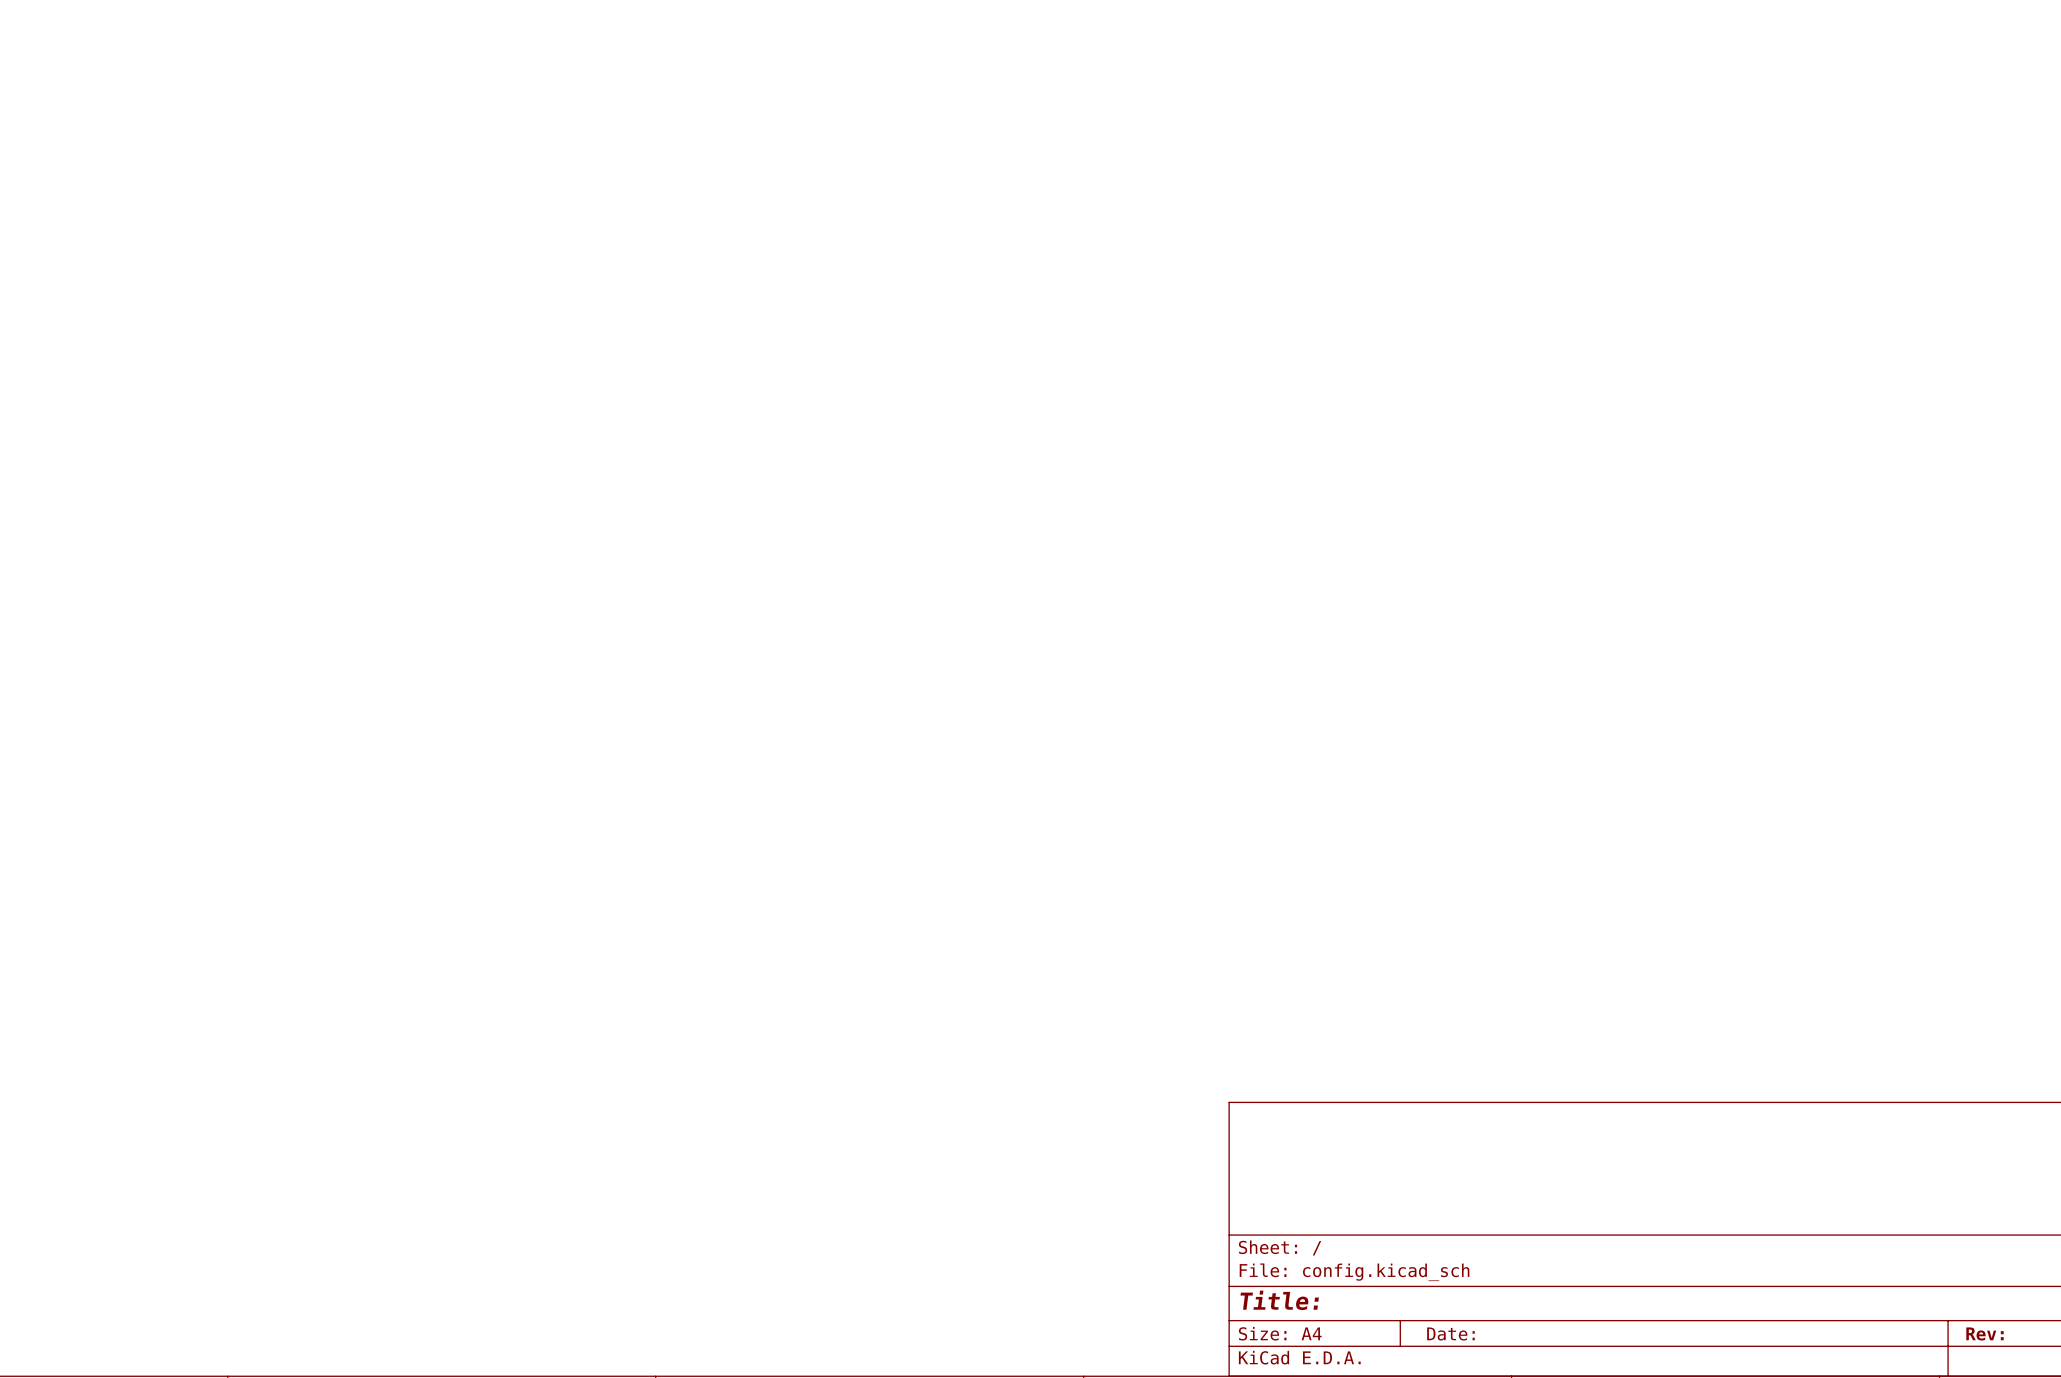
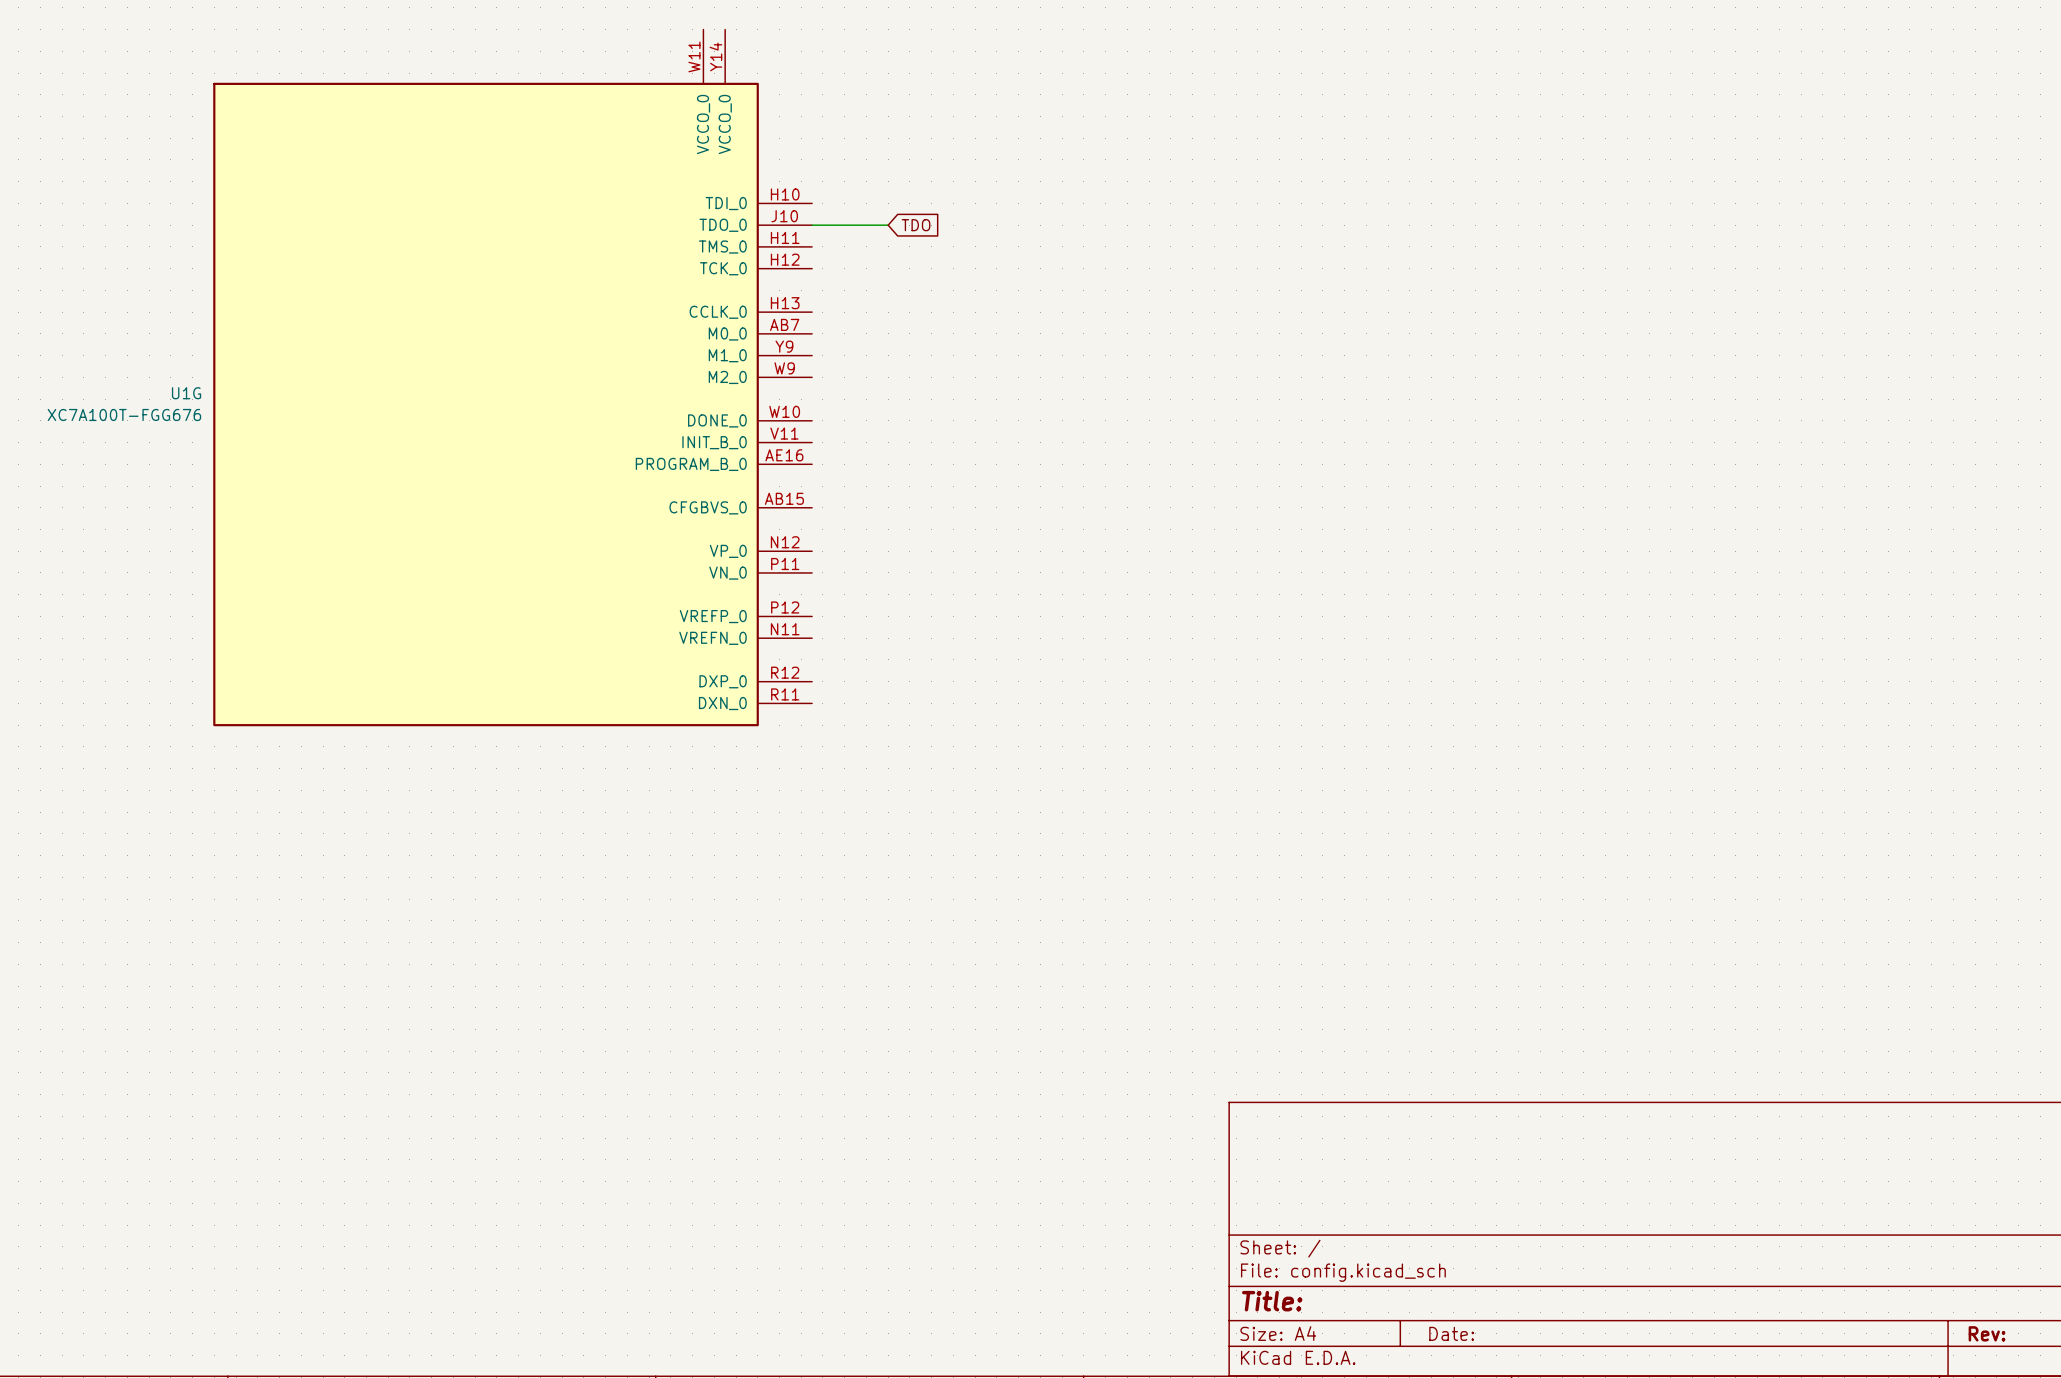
wire: none -> (812, 225) (888, 225)
global label: none -> TDO (916, 225)
U1G: none -> XC7A100T-FGG676 (512, 377)

